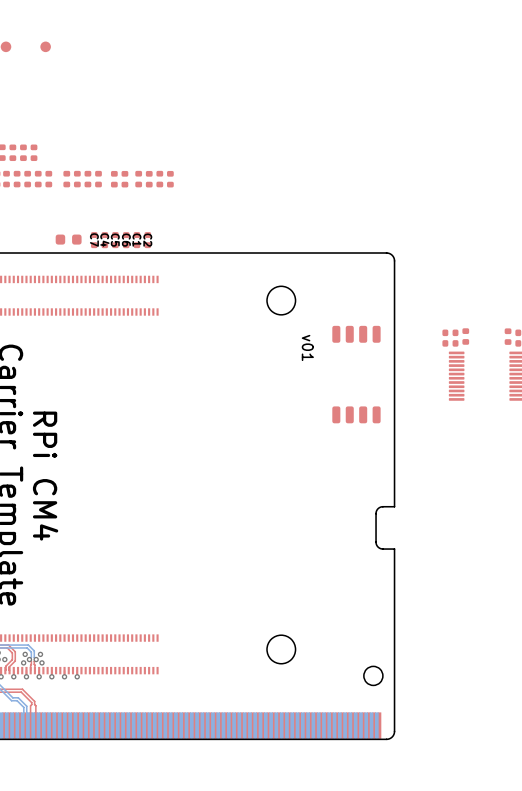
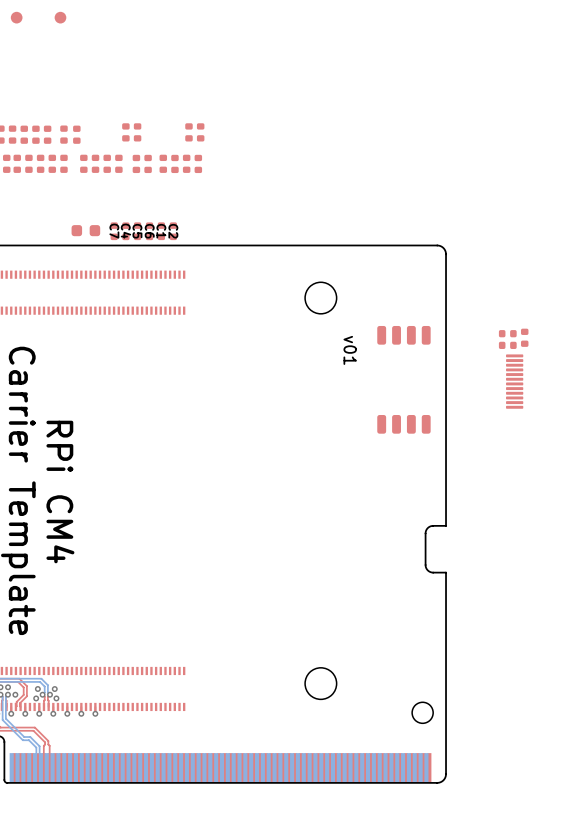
part: none -> (125, 132)
part: none -> (137, 132)
part: none -> (188, 132)
part: none -> (200, 132)
part: none -> (63, 134)
part: none -> (76, 134)

